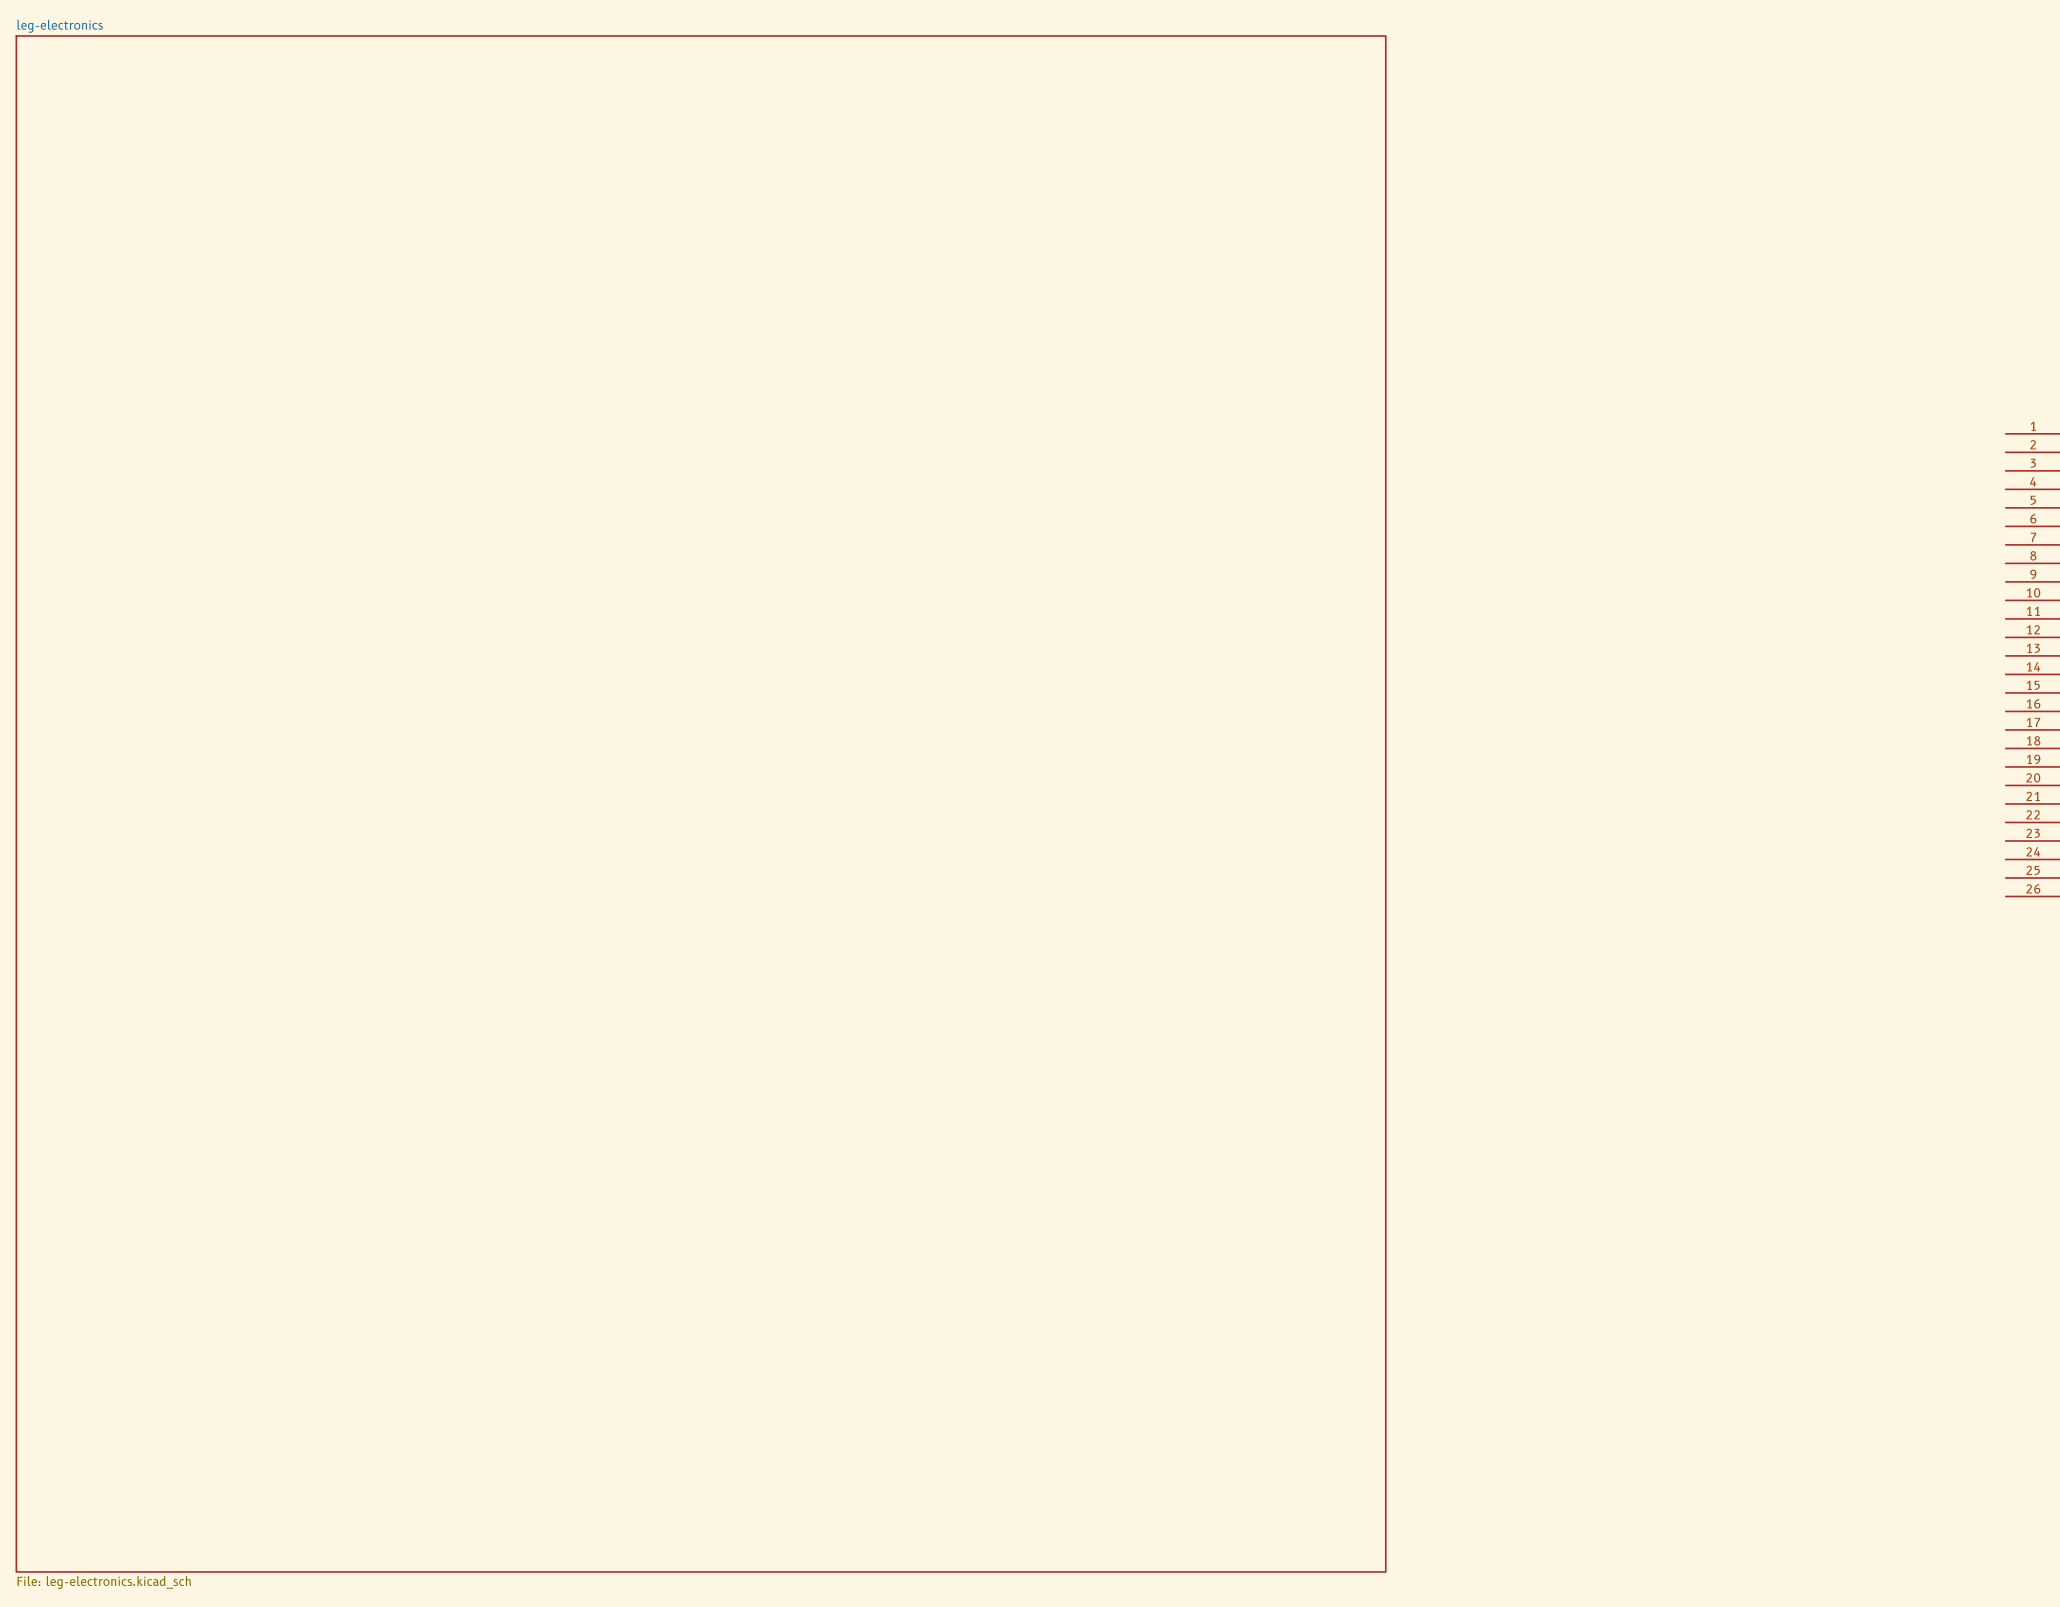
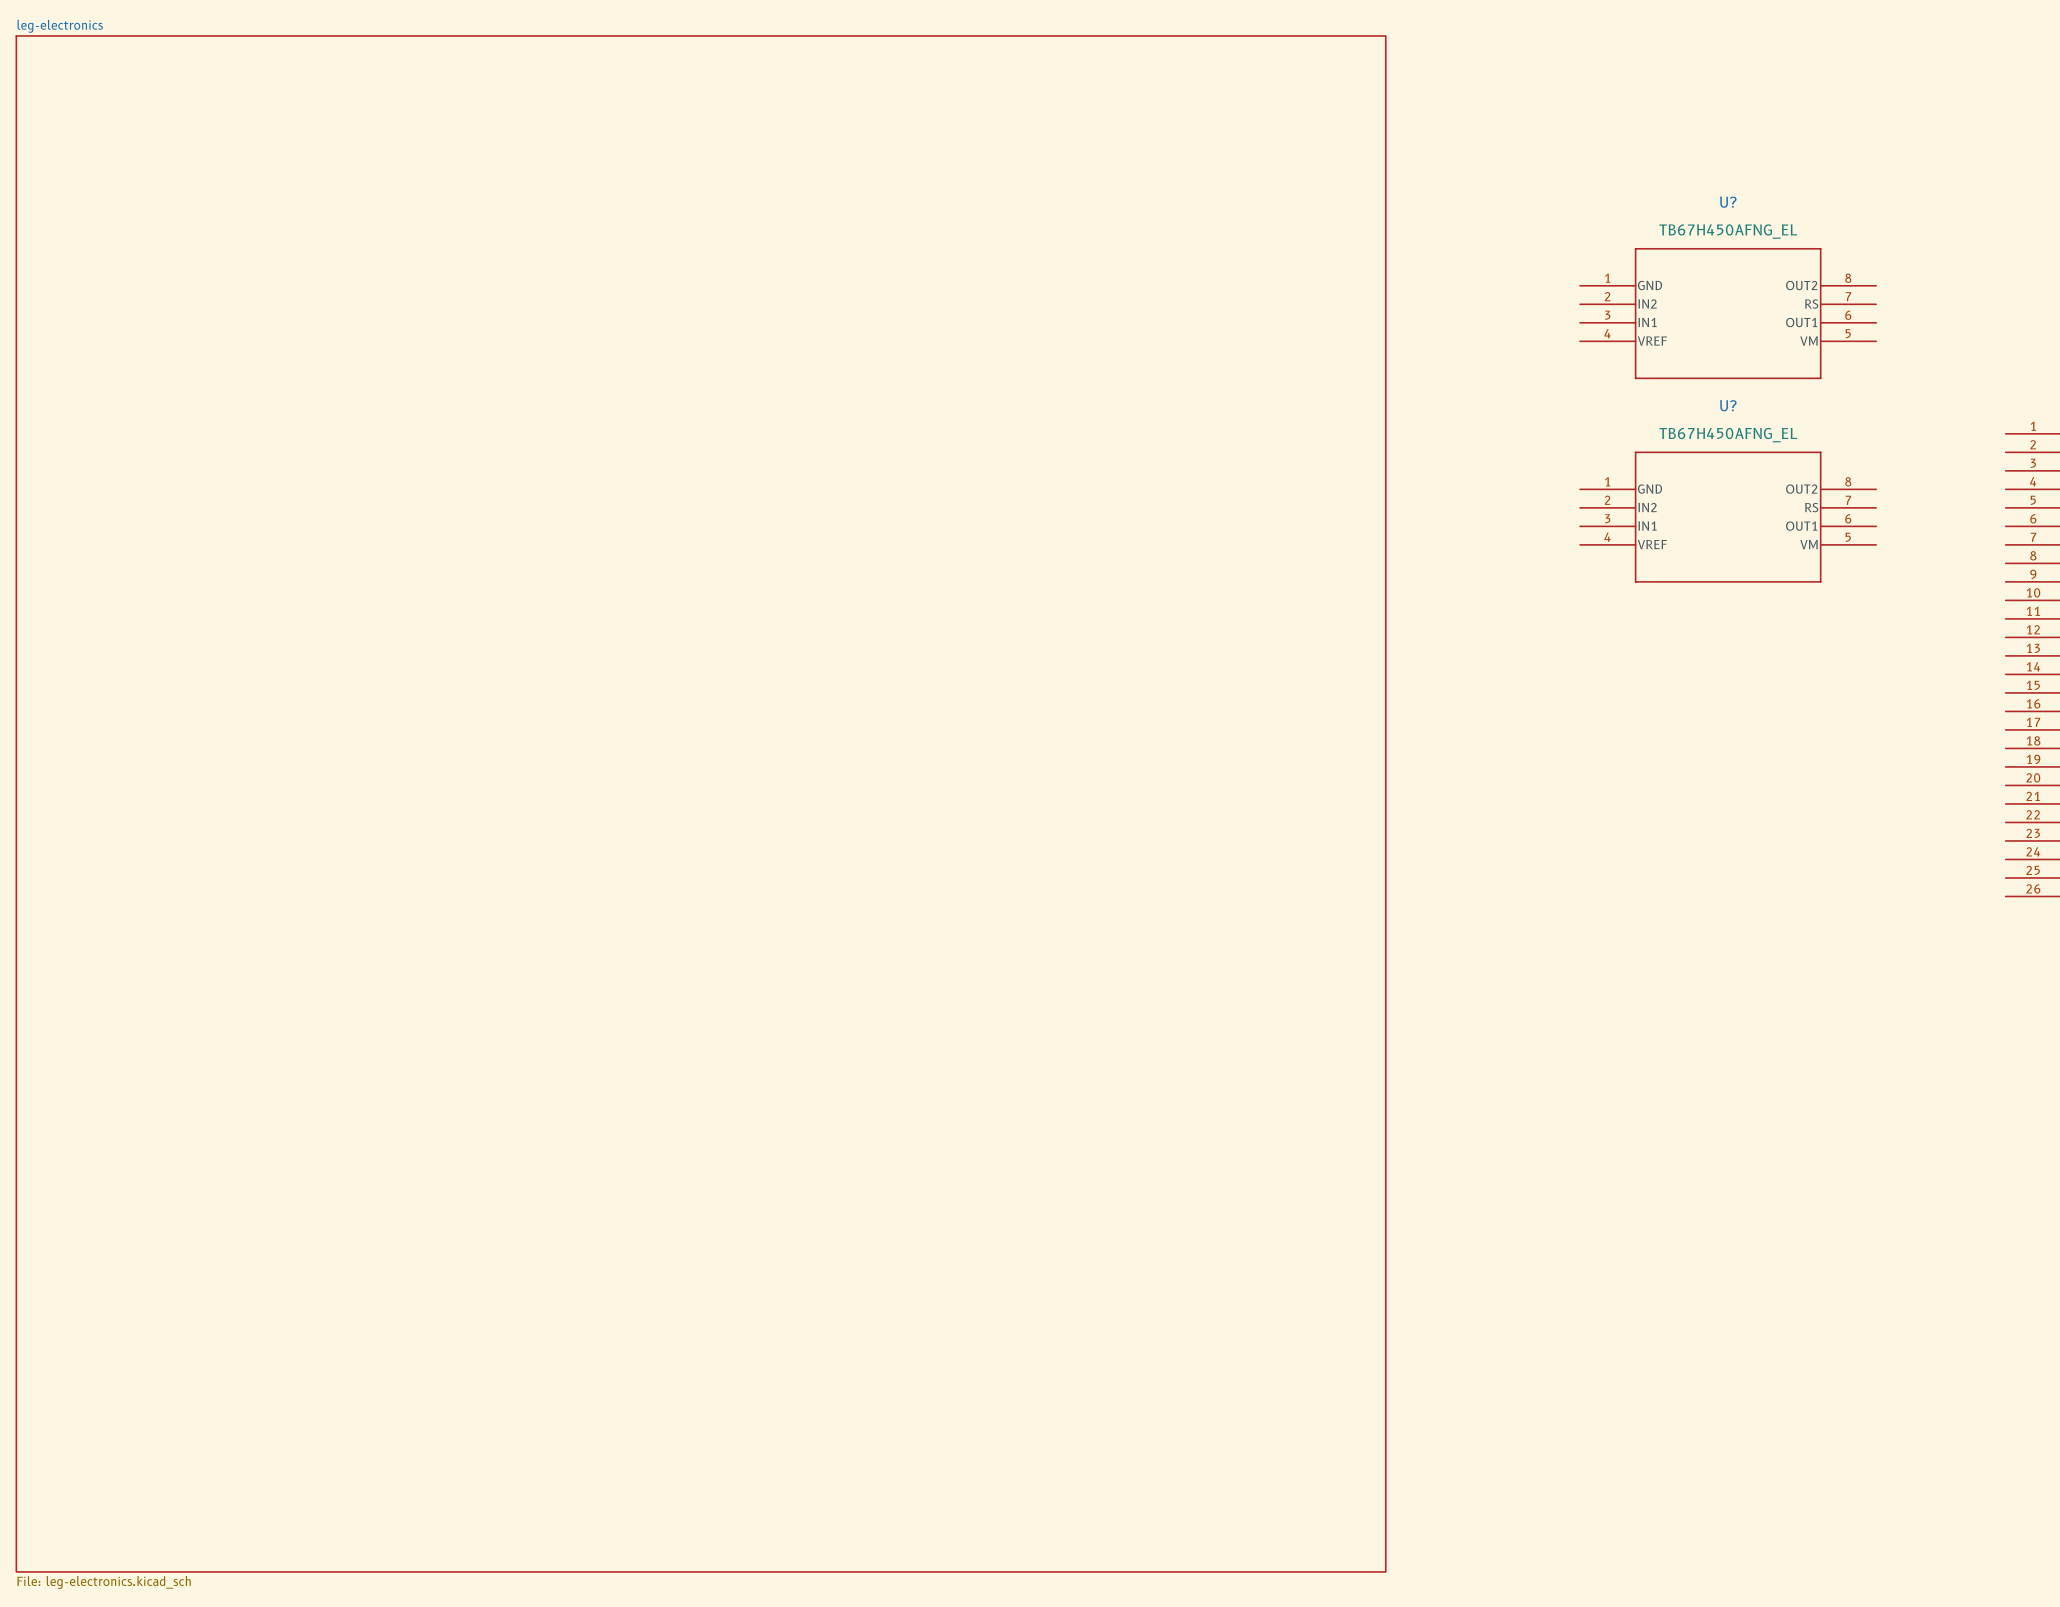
U?: none -> TB67H450AFNG_EL (1728, 313)
U?: none -> TB67H450AFNG_EL (1728, 517)

